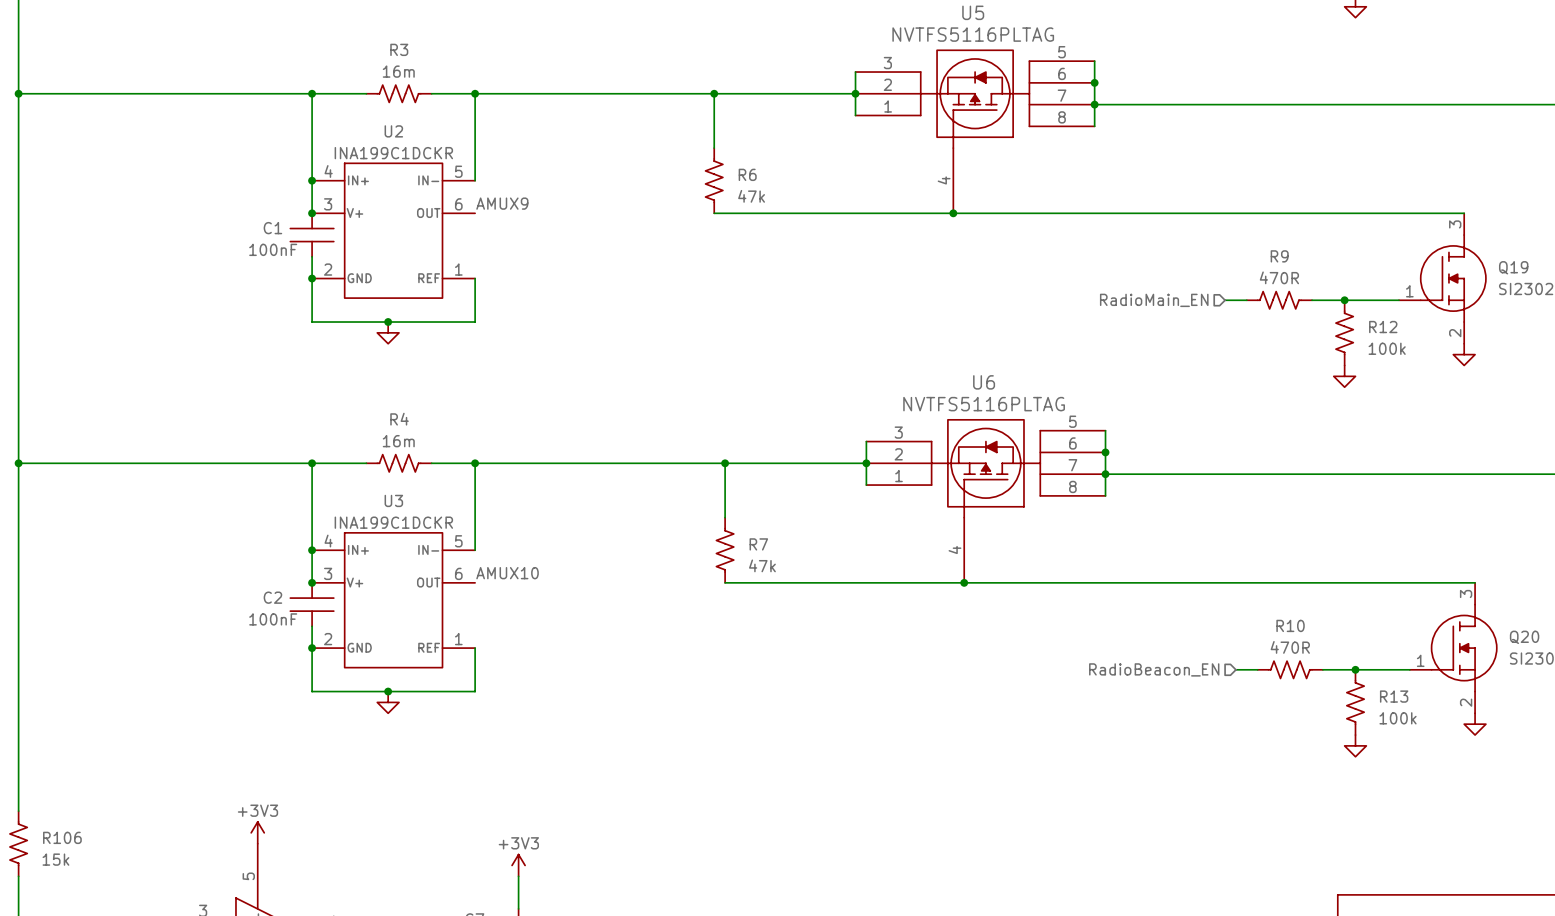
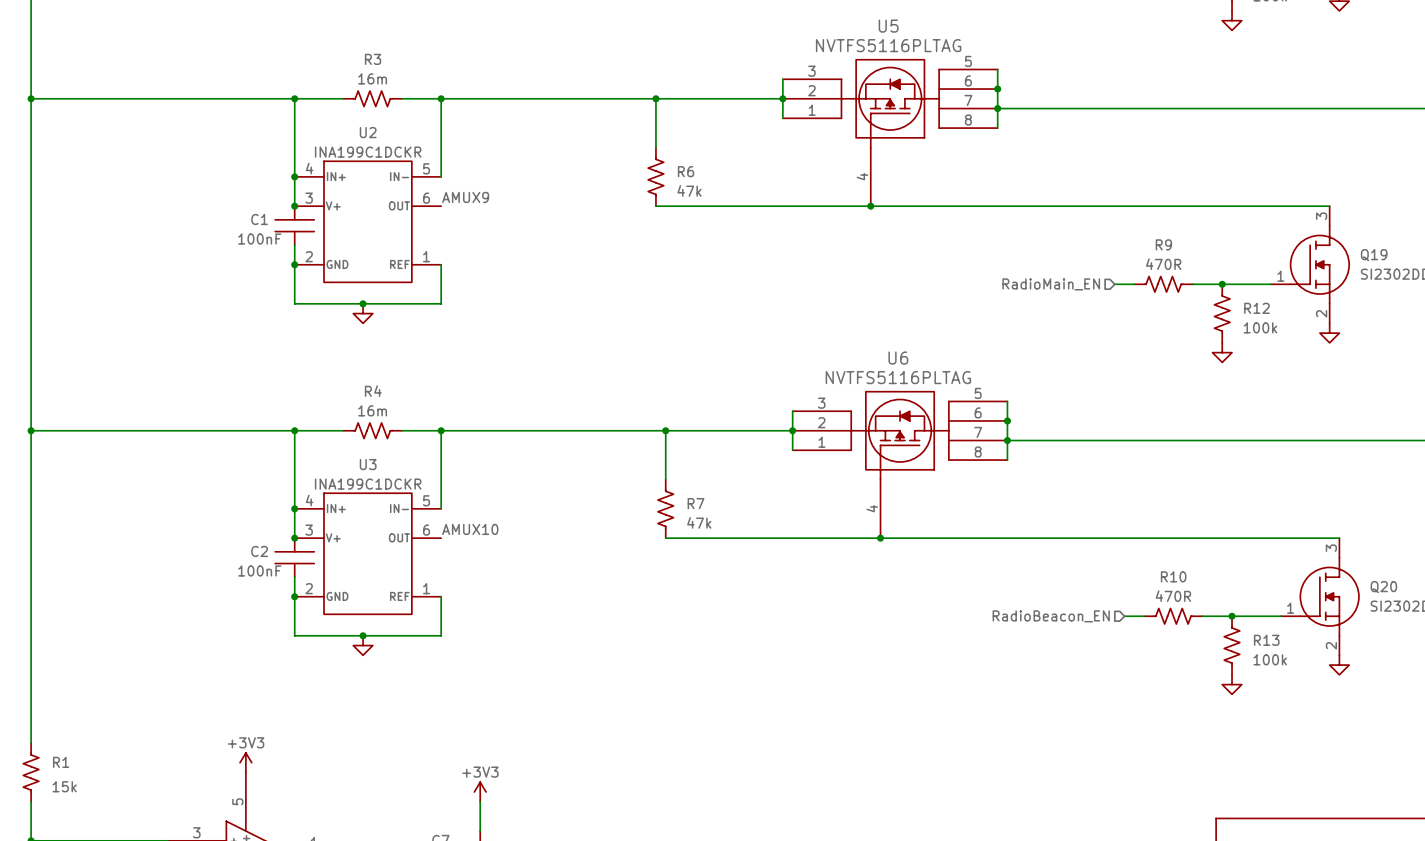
R106 name: R106 (62, 837) -> R1 (61, 762)

